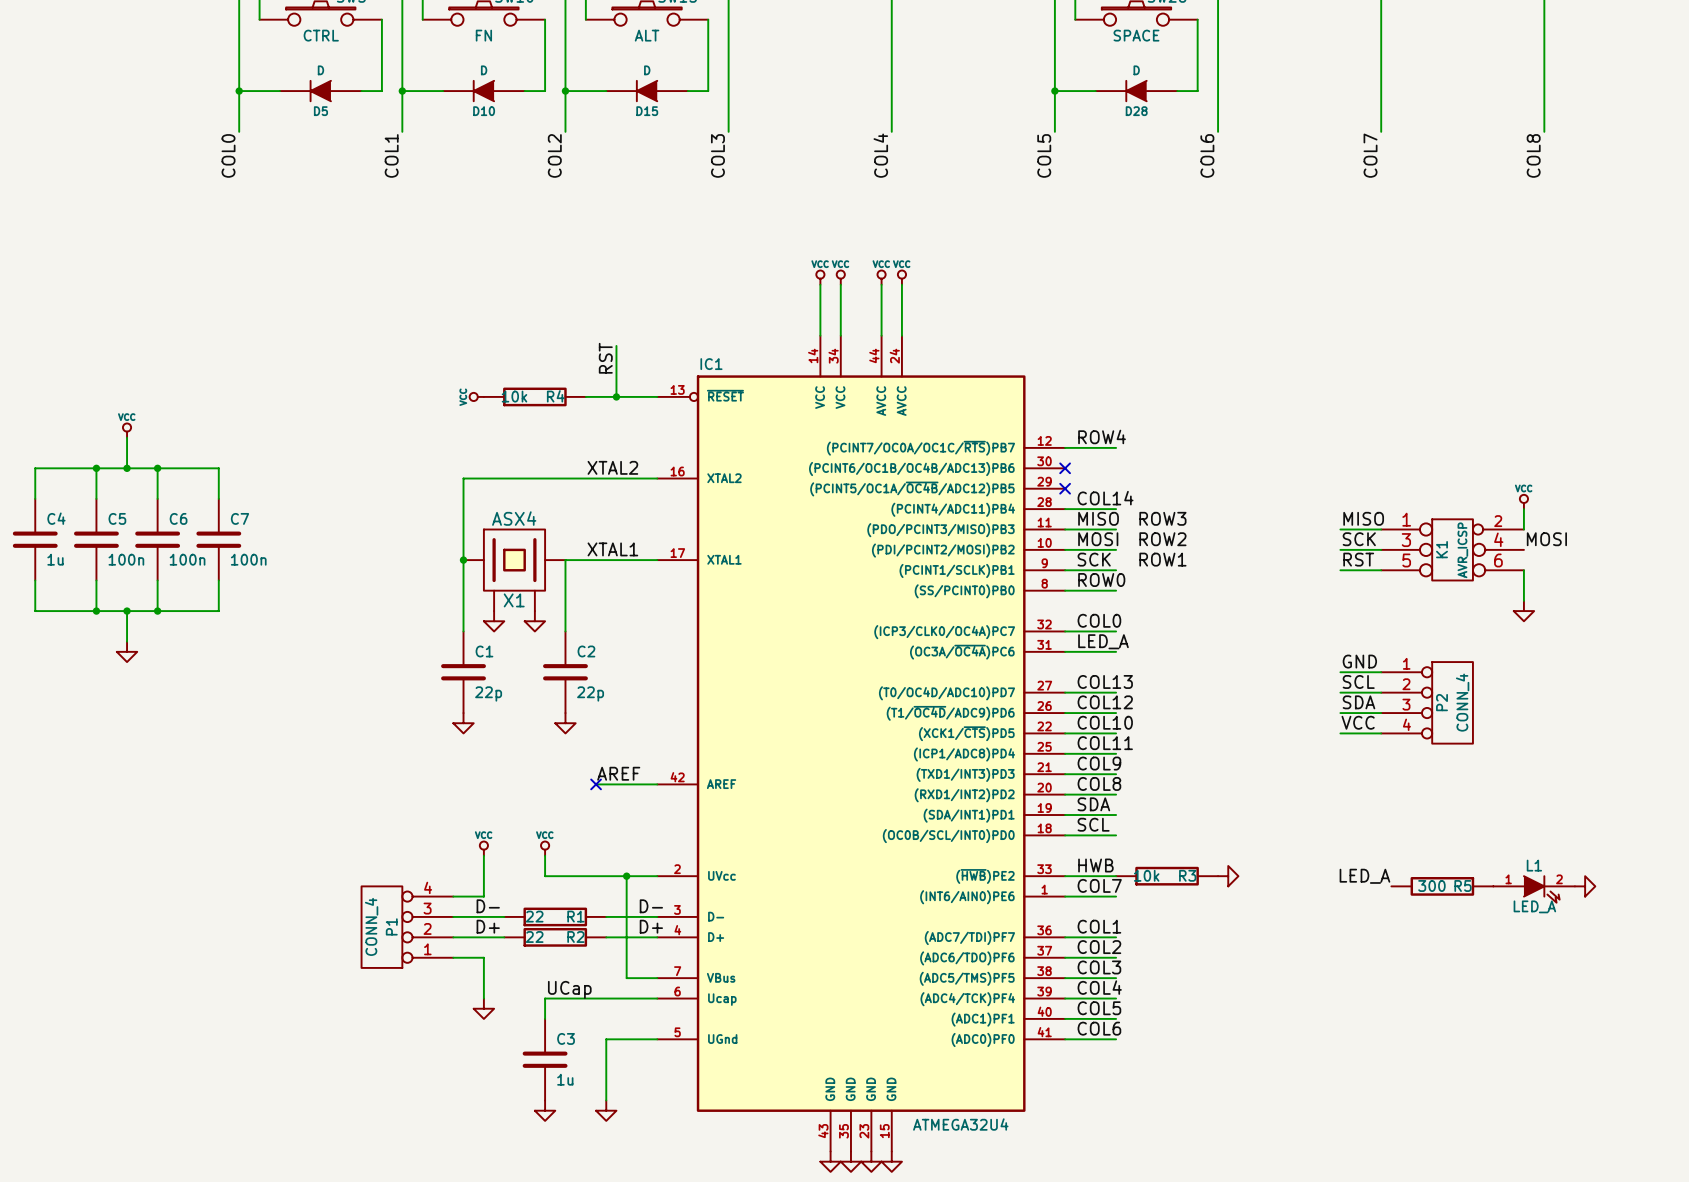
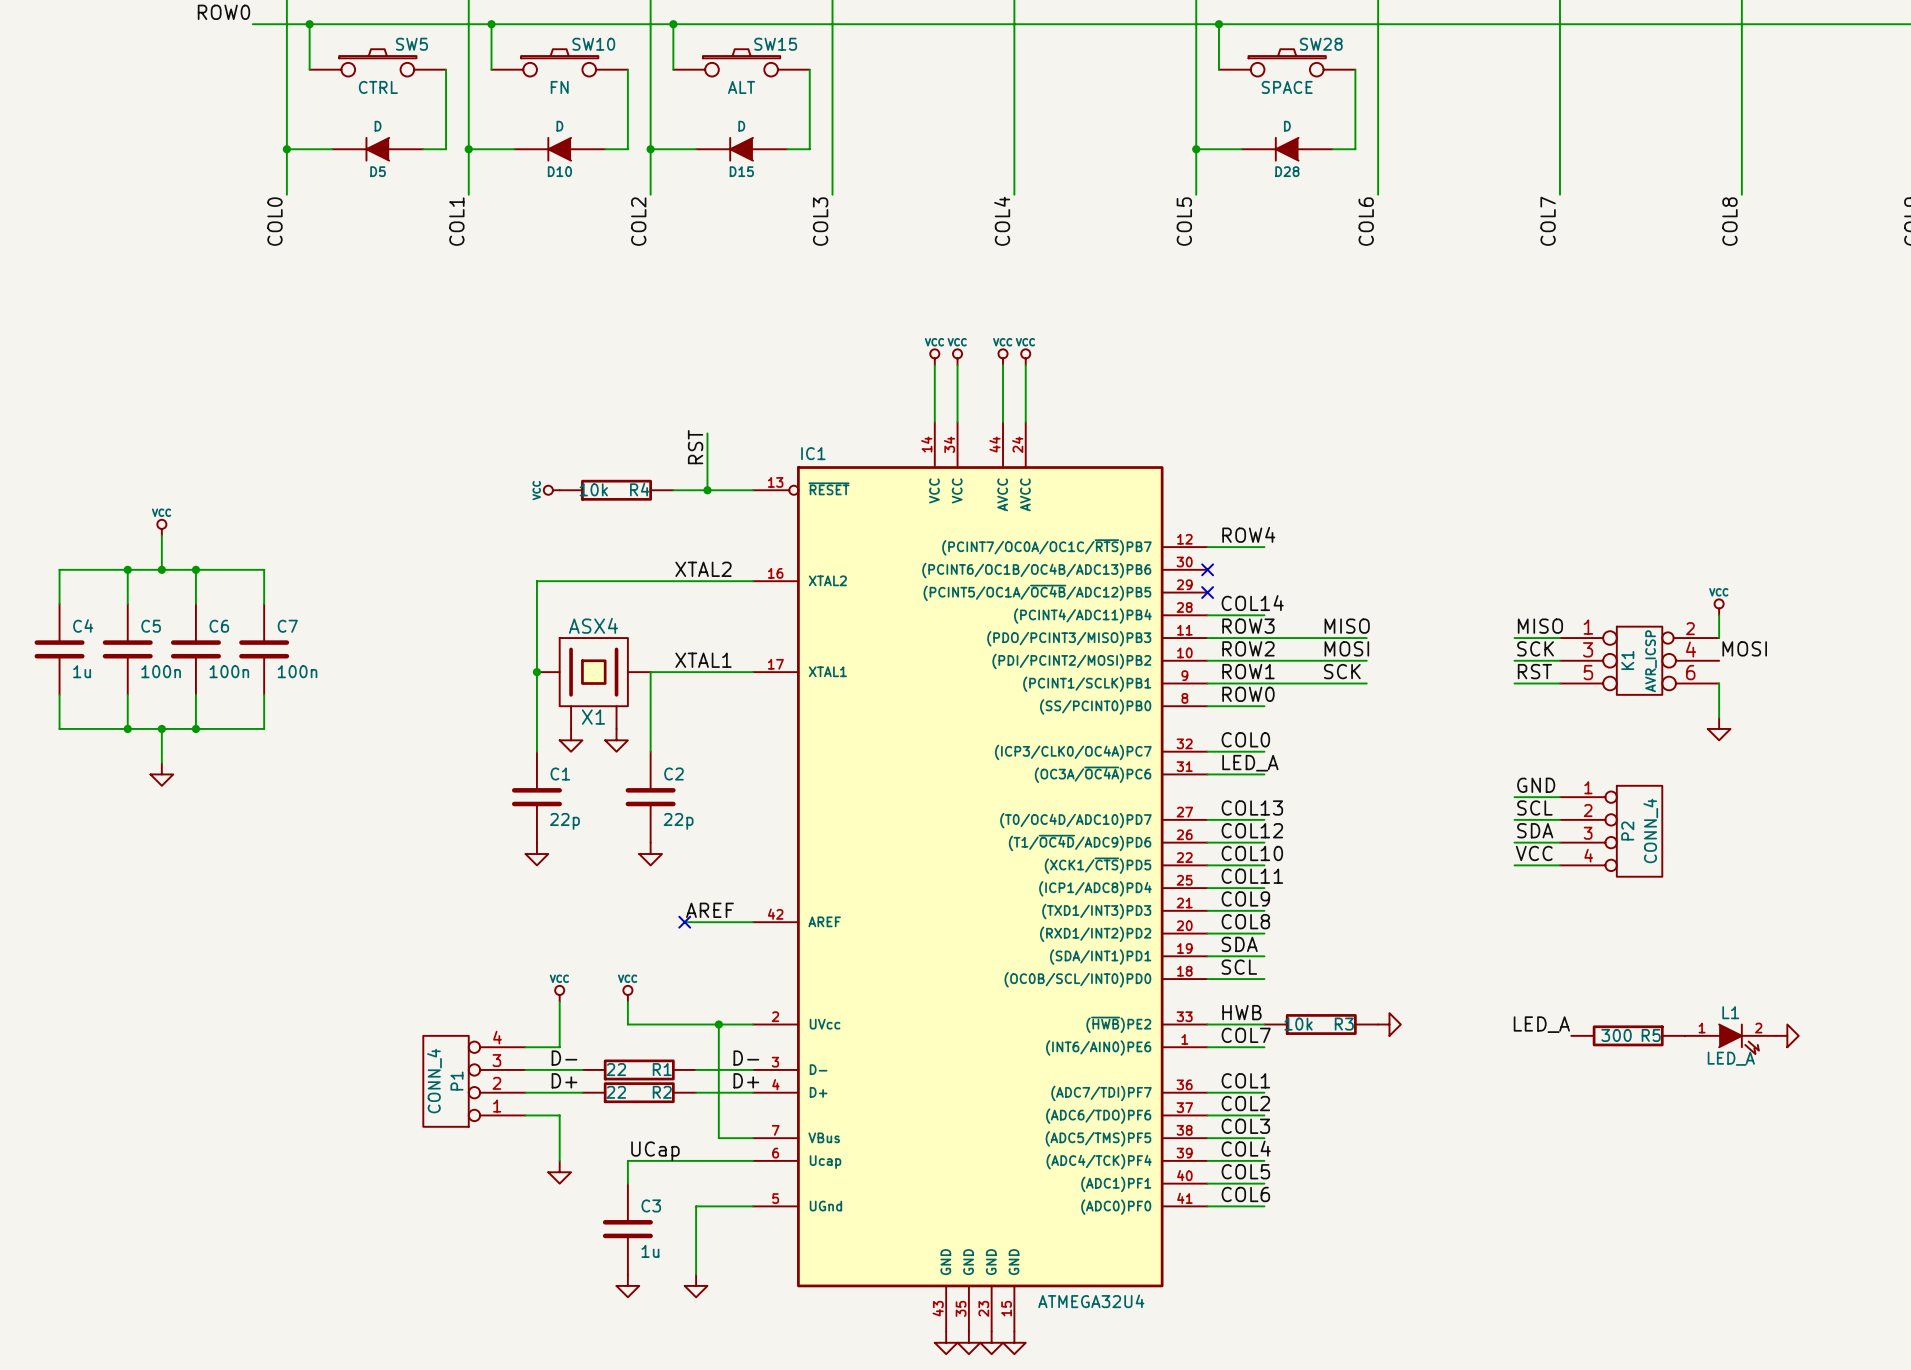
label: MISO (1098, 518) -> ROW3 (1248, 626)
label: ROW3 (1162, 518) -> none
label: none -> MISO (1347, 626)
wire: none -> (1264, 638) (1366, 638)
label: MOSI (1098, 539) -> ROW2 (1248, 648)
label: ROW2 (1162, 539) -> none
label: none -> MOSI (1346, 648)
wire: none -> (1264, 660) (1366, 660)
label: SCK (1094, 559) -> ROW1 (1248, 671)
label: ROW1 (1162, 559) -> none
label: none -> SCK (1342, 671)
wire: none -> (1264, 683) (1366, 683)

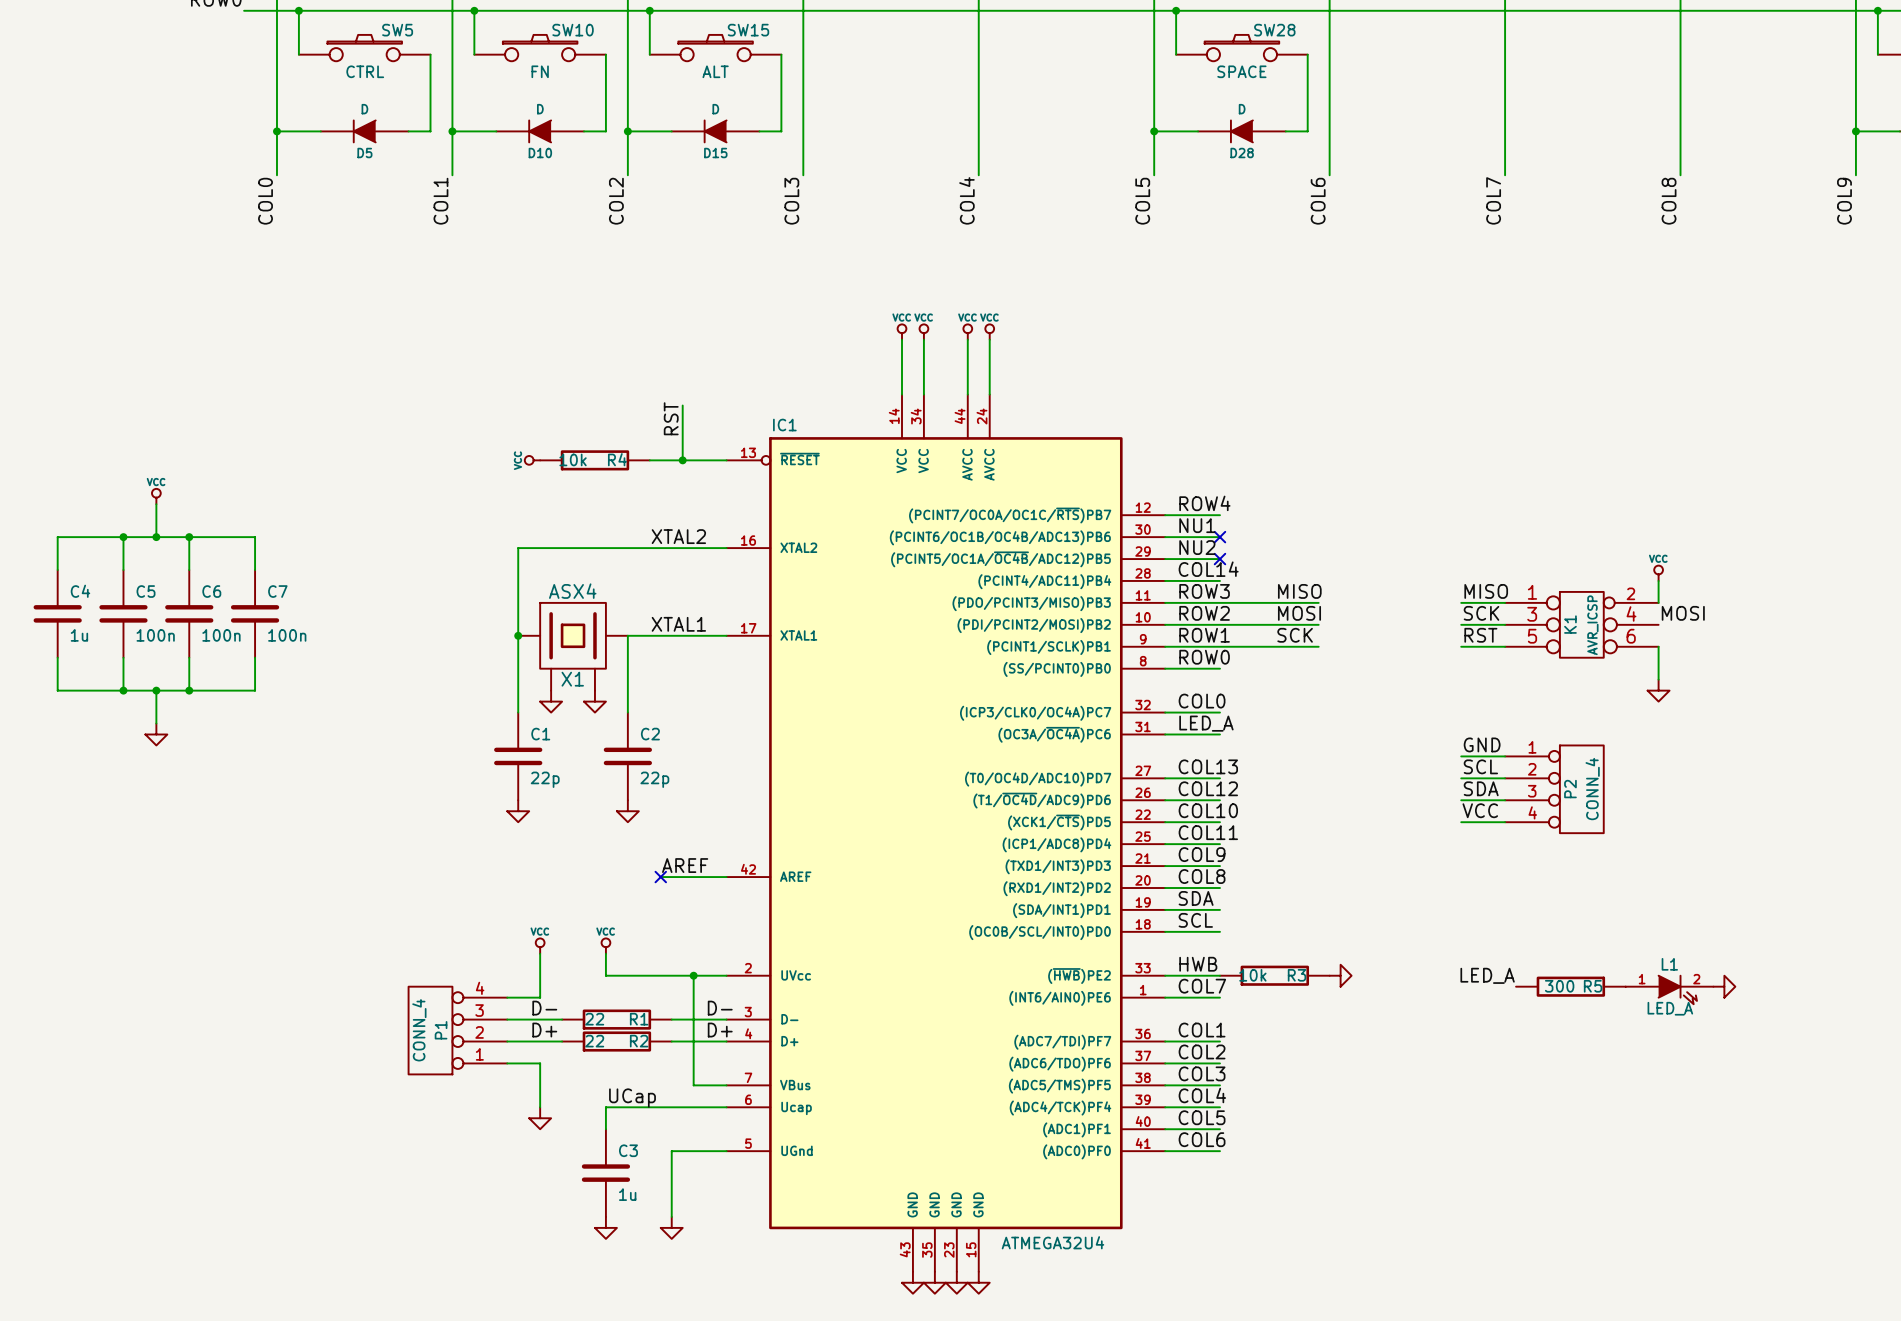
label: none -> NU1 (1197, 525)
wire: none -> (1165, 537) (1219, 537)
no-connect mark: (1207, 569) -> none
no-connect mark: none -> (1219, 537)
label: none -> NU2 (1197, 547)
wire: none -> (1165, 559) (1219, 559)
no-connect mark: (1207, 592) -> none
no-connect mark: none -> (1219, 559)

